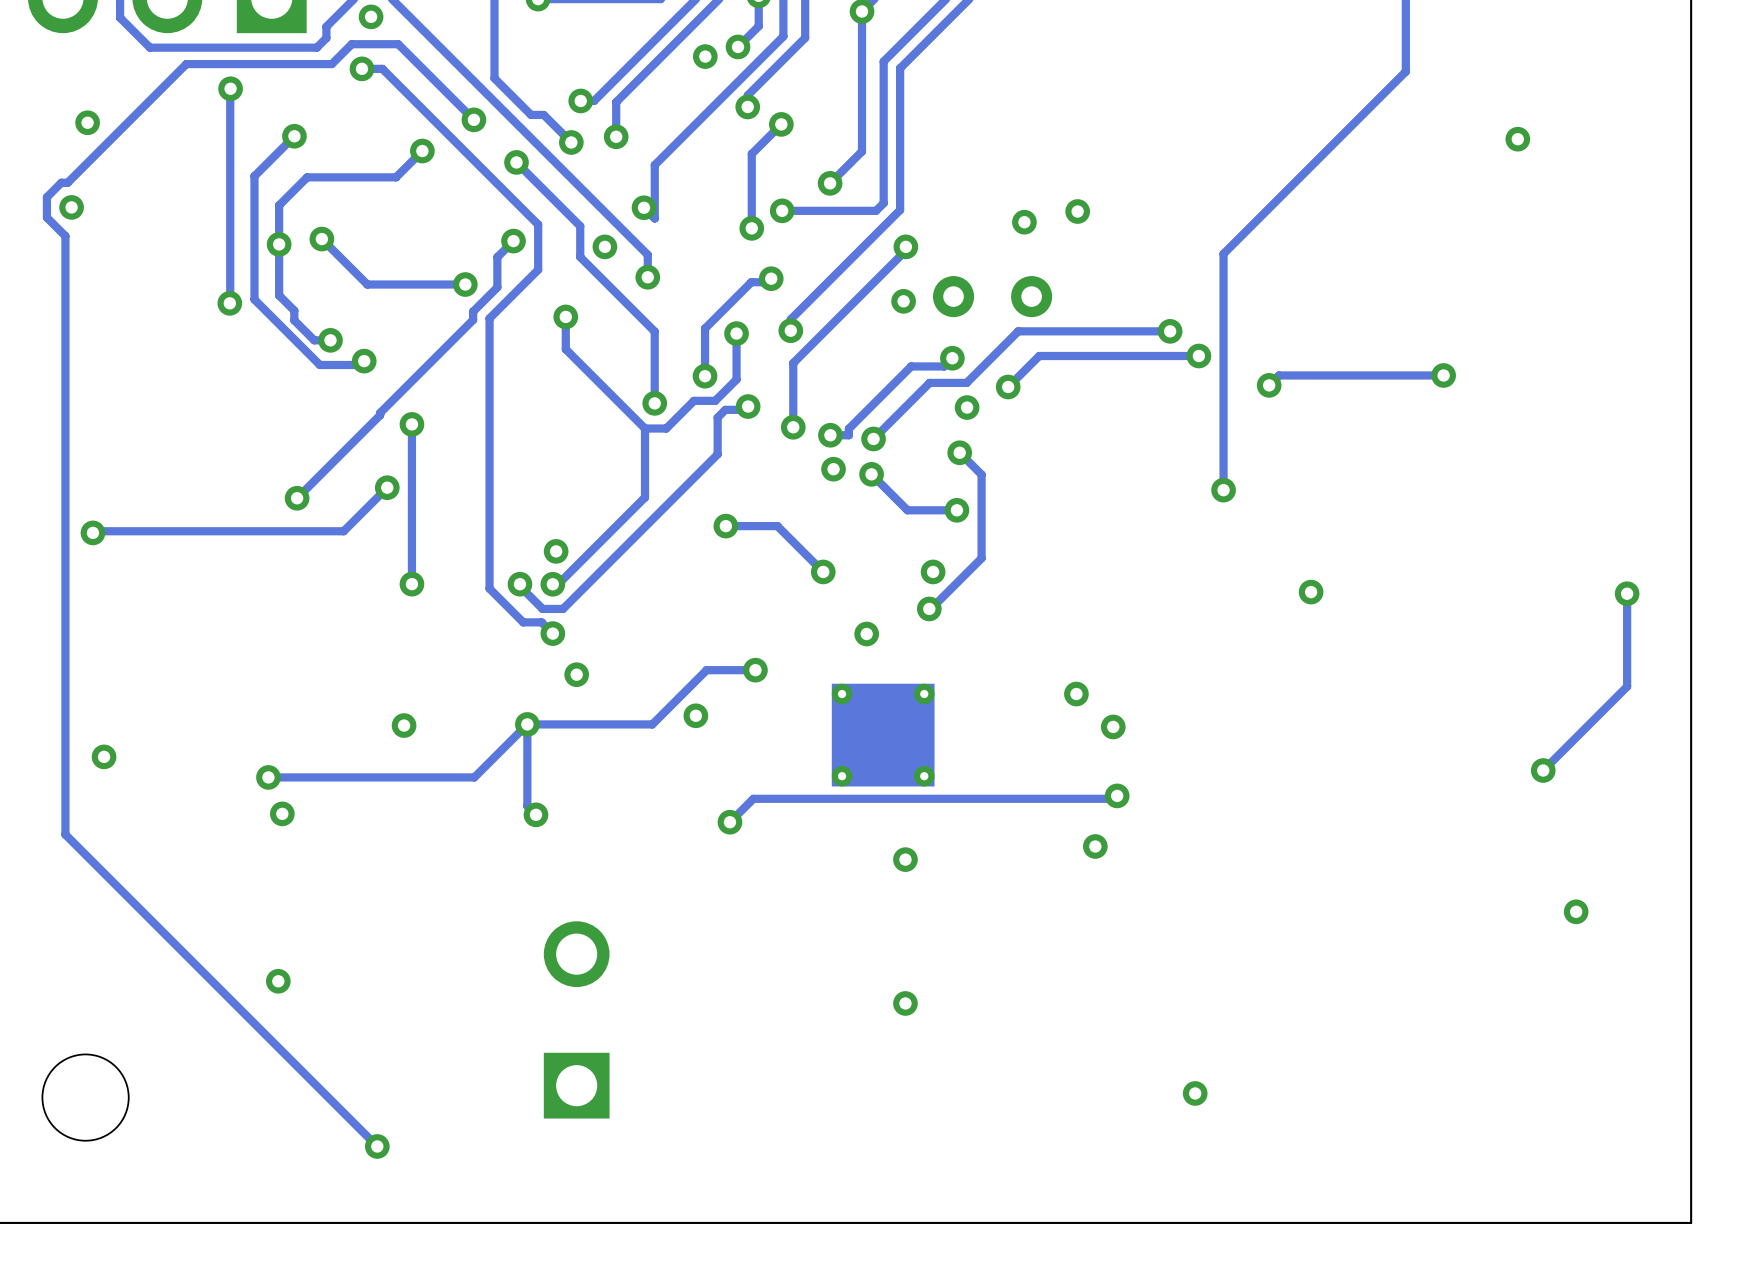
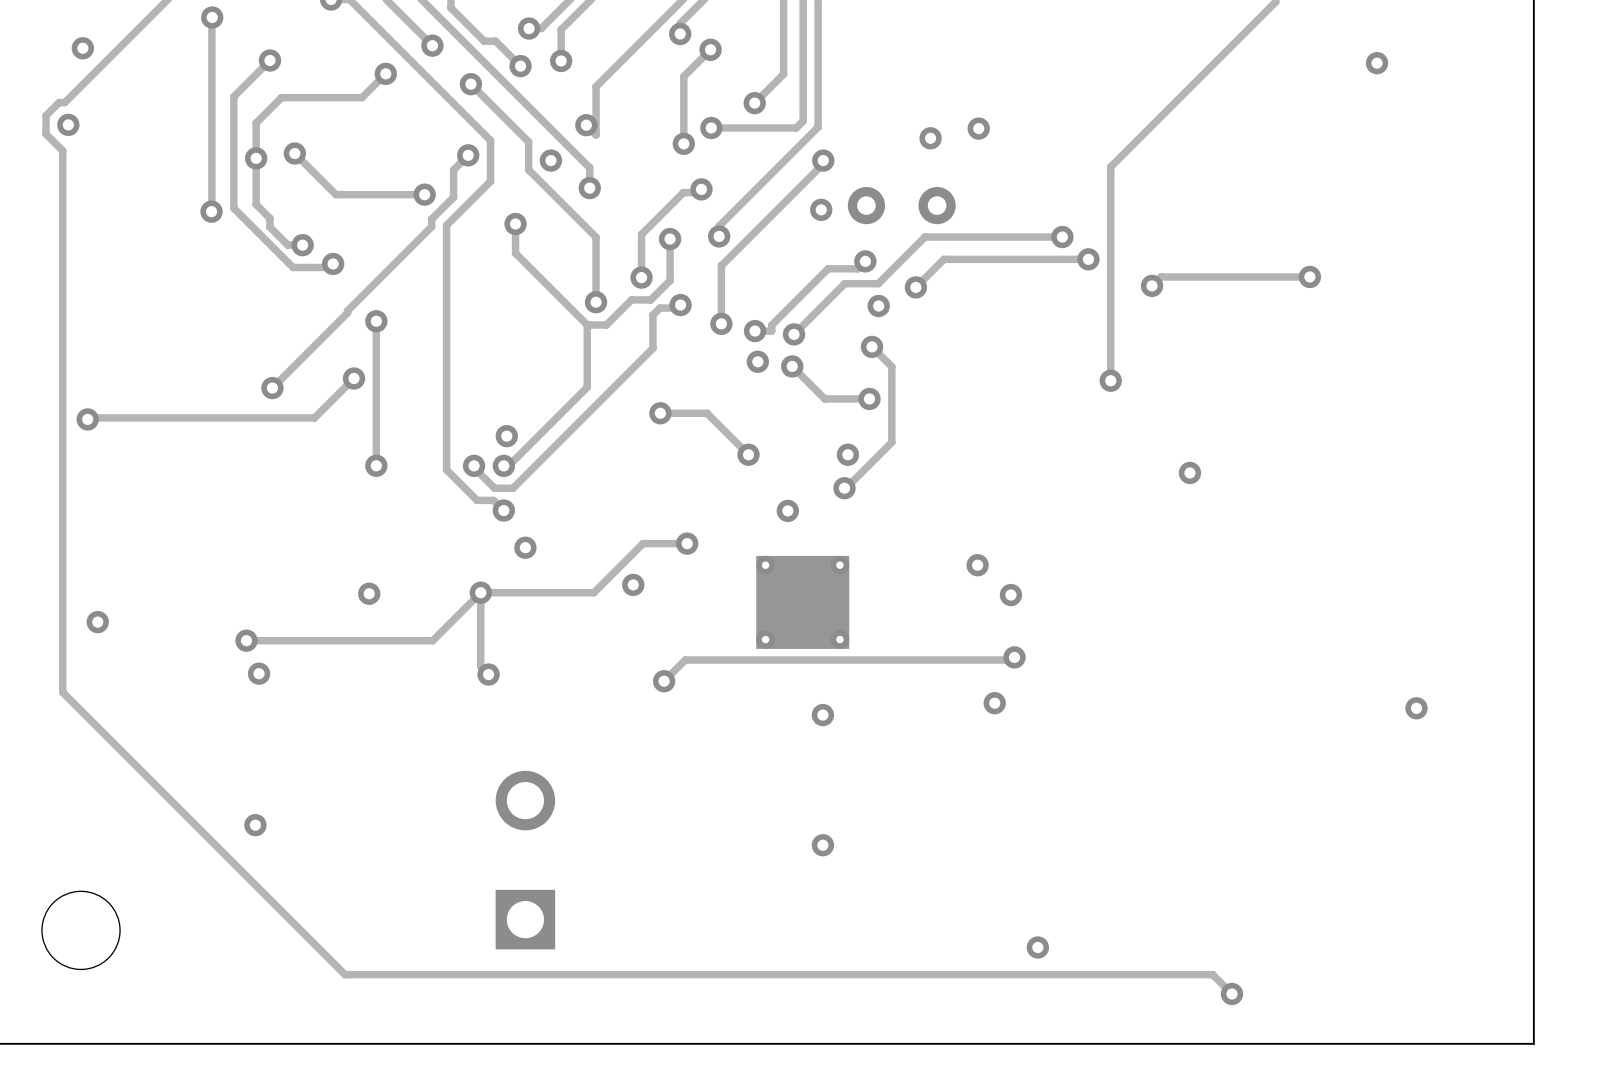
track: (1627, 593) (1627, 686) (1543, 770) -> none
via: (1627, 593) -> none
via: (1543, 770) -> none
via: none -> (1416, 708)
via: (1576, 911) -> none
via position: (1195, 1093) -> (1037, 947)
track: none -> (345, 974) (1212, 974) (1231, 993)
via: (377, 1146) -> none
via: none -> (1231, 993)

